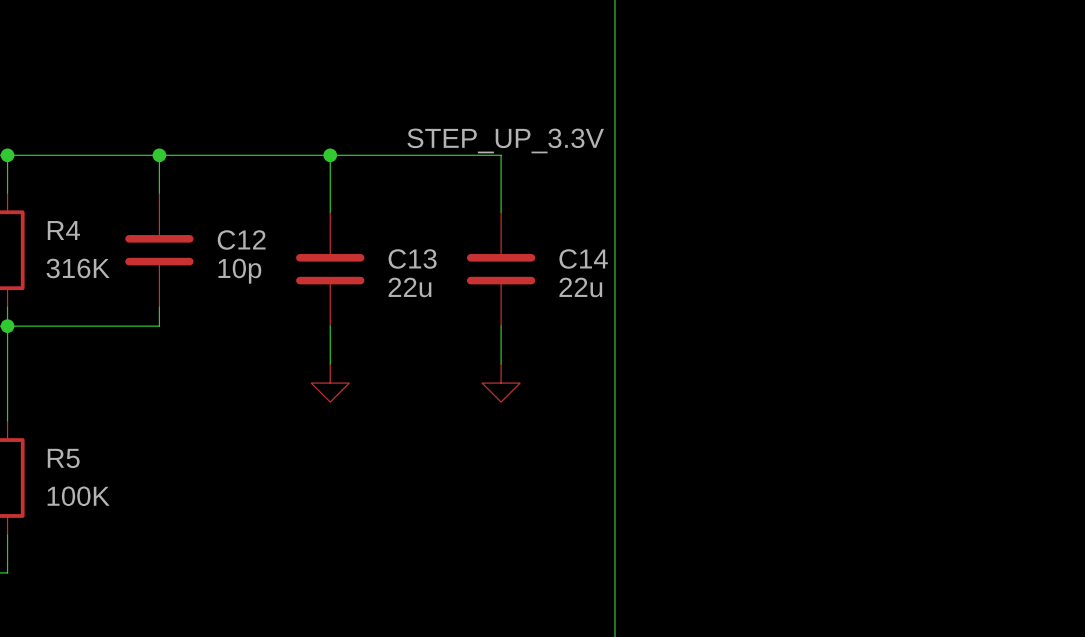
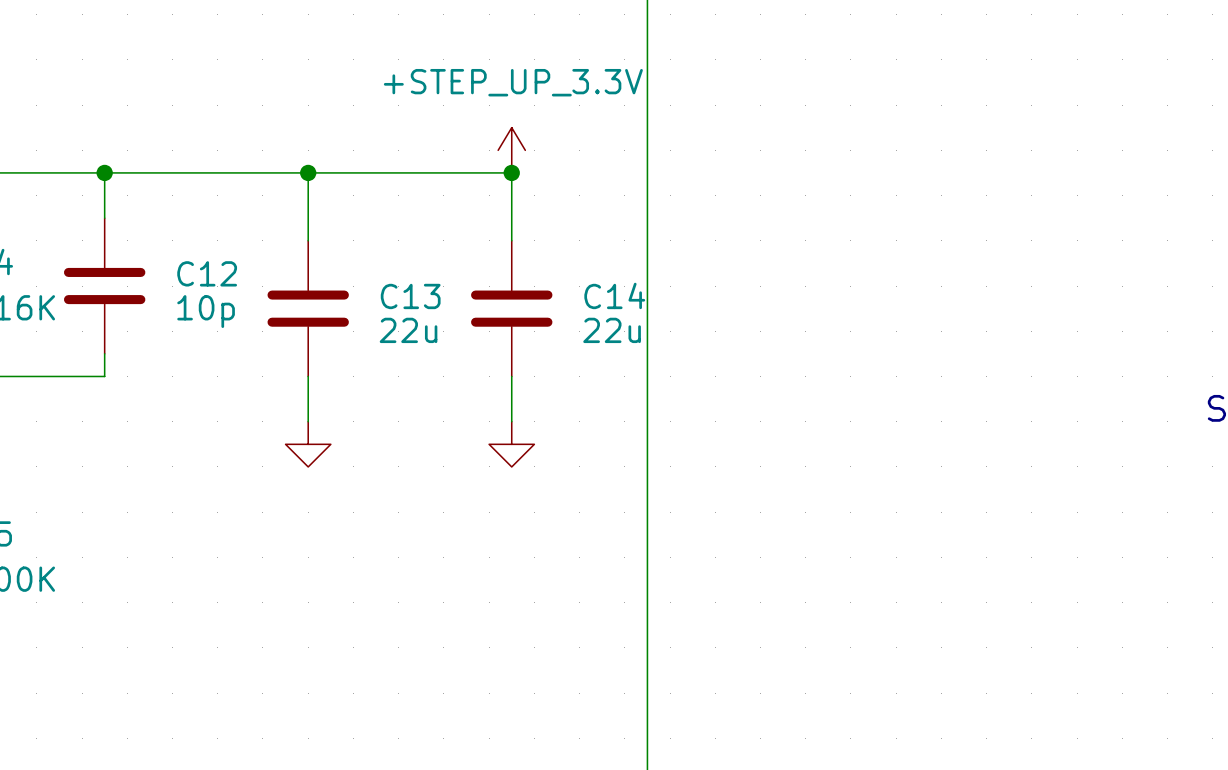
power symbol: none -> +STEP_UP_3.3V (511, 150)
label: STEP_UP_3.3V (505, 140) -> none
junction: none -> (511, 172)

